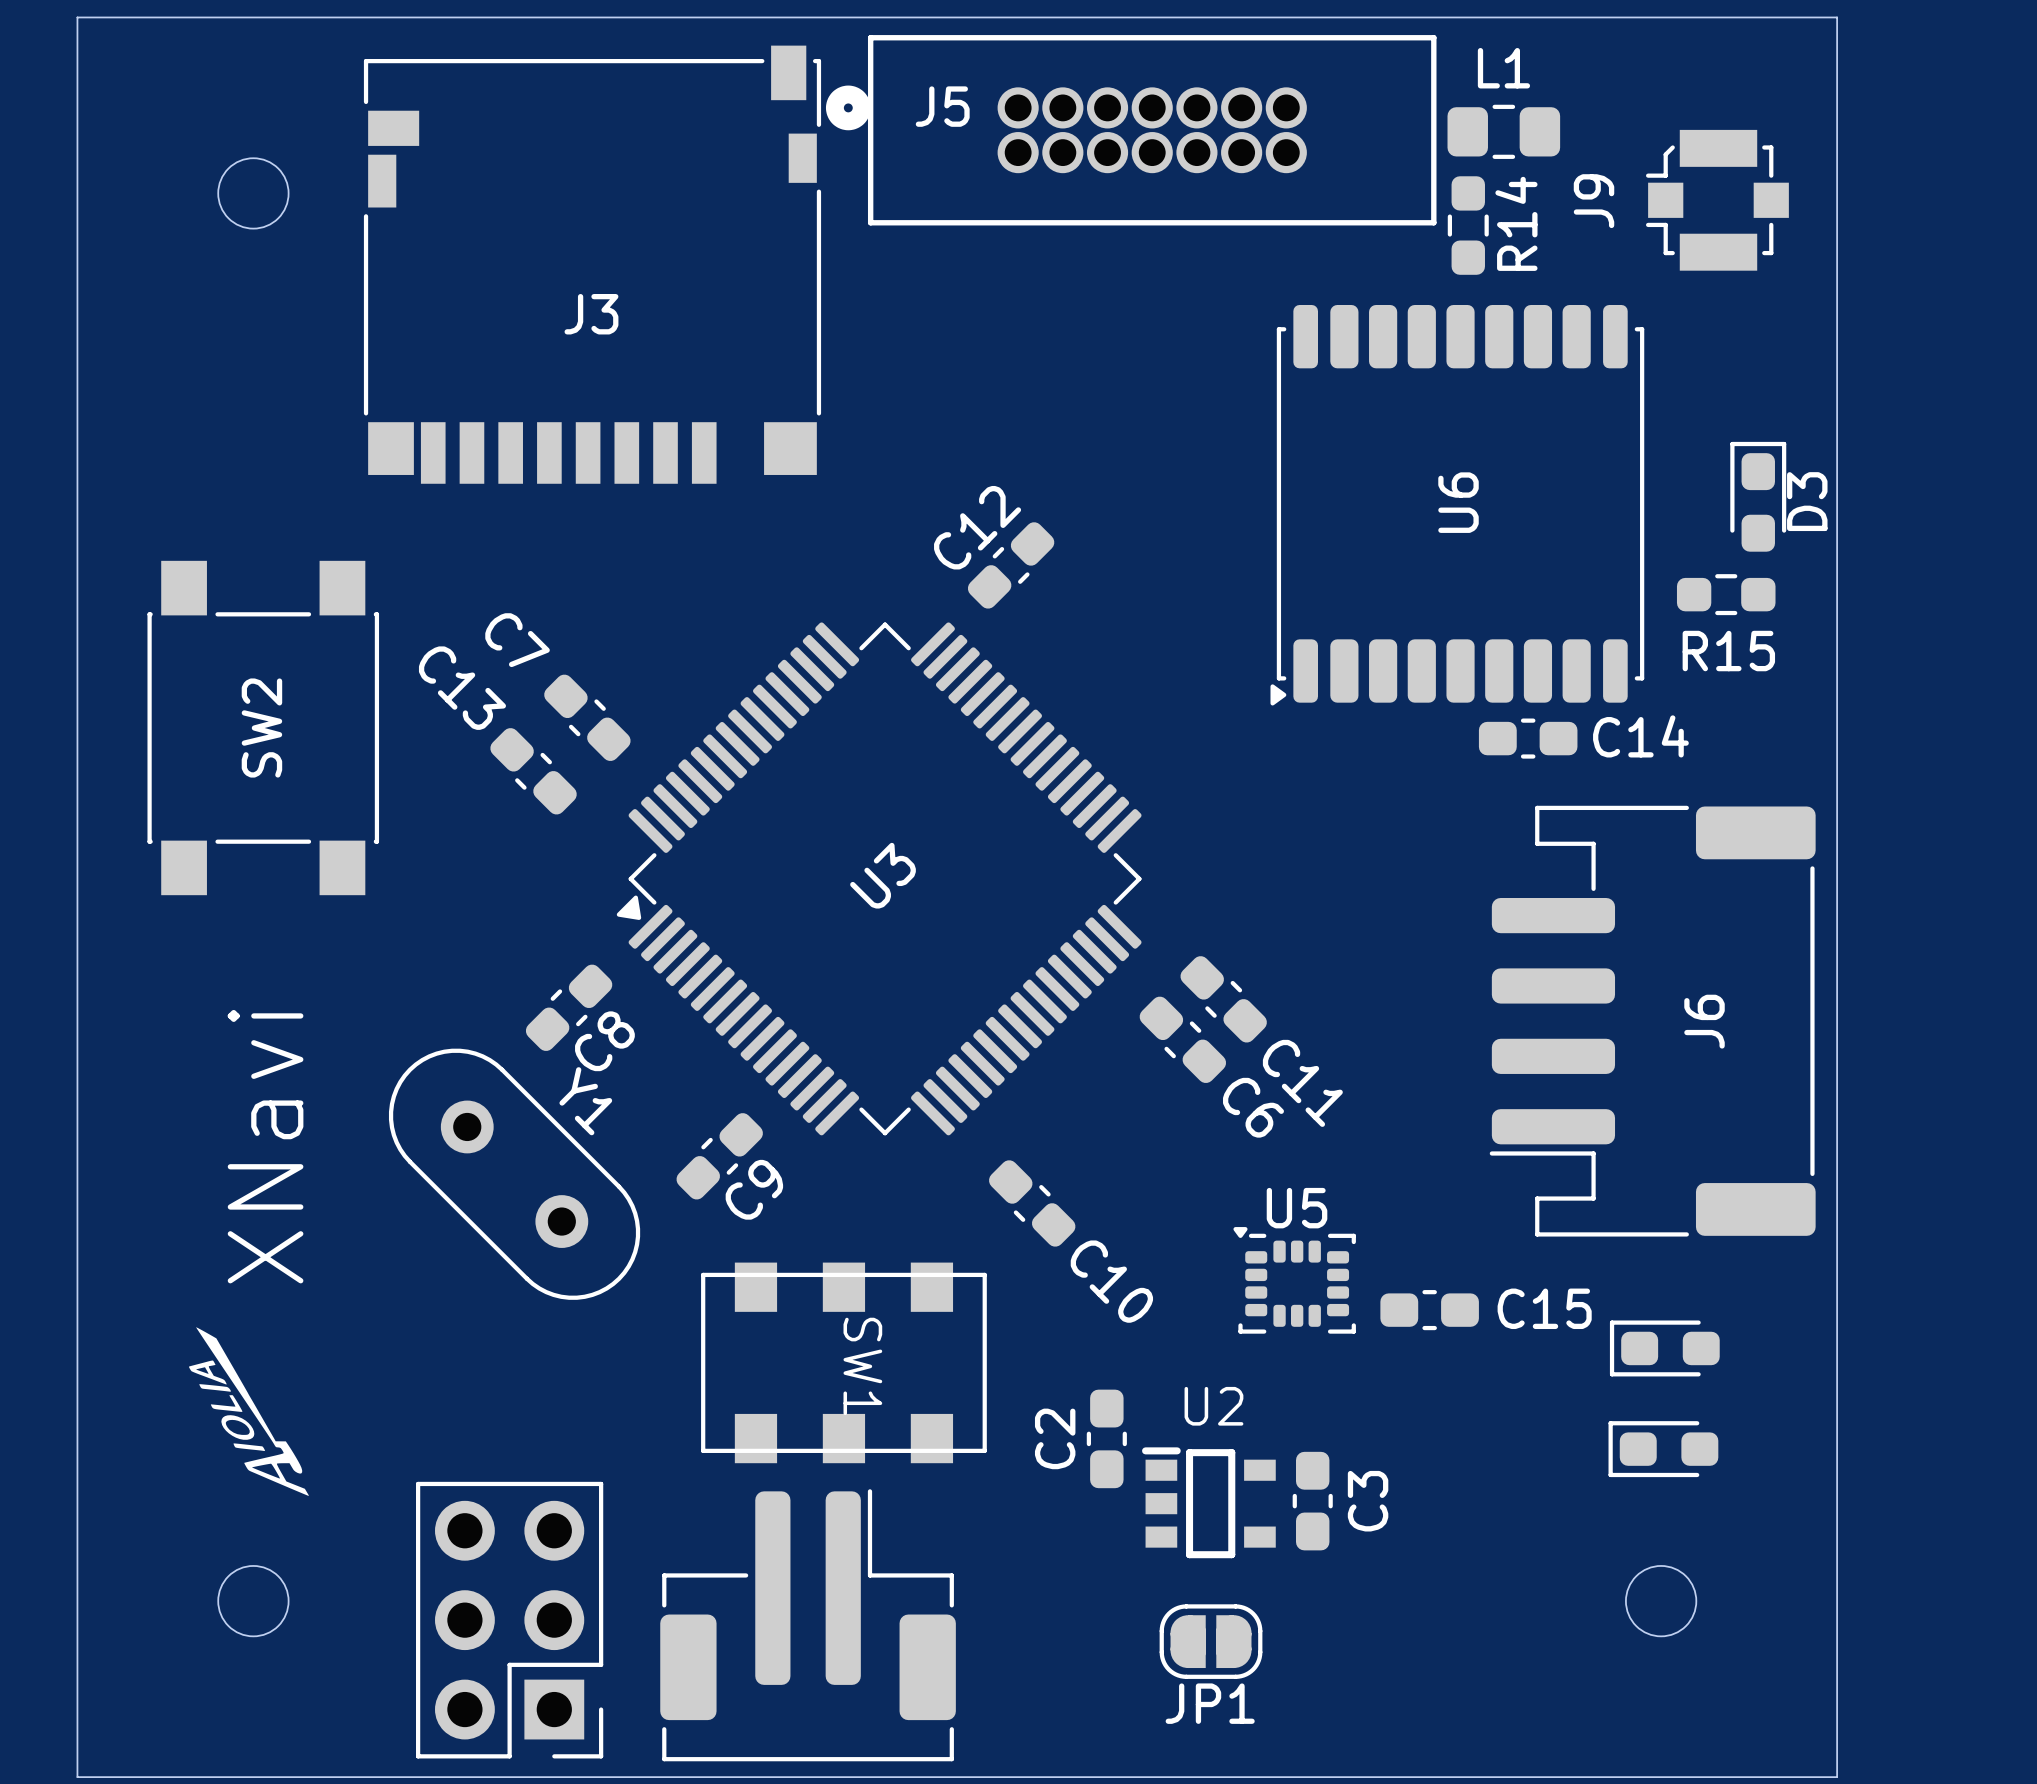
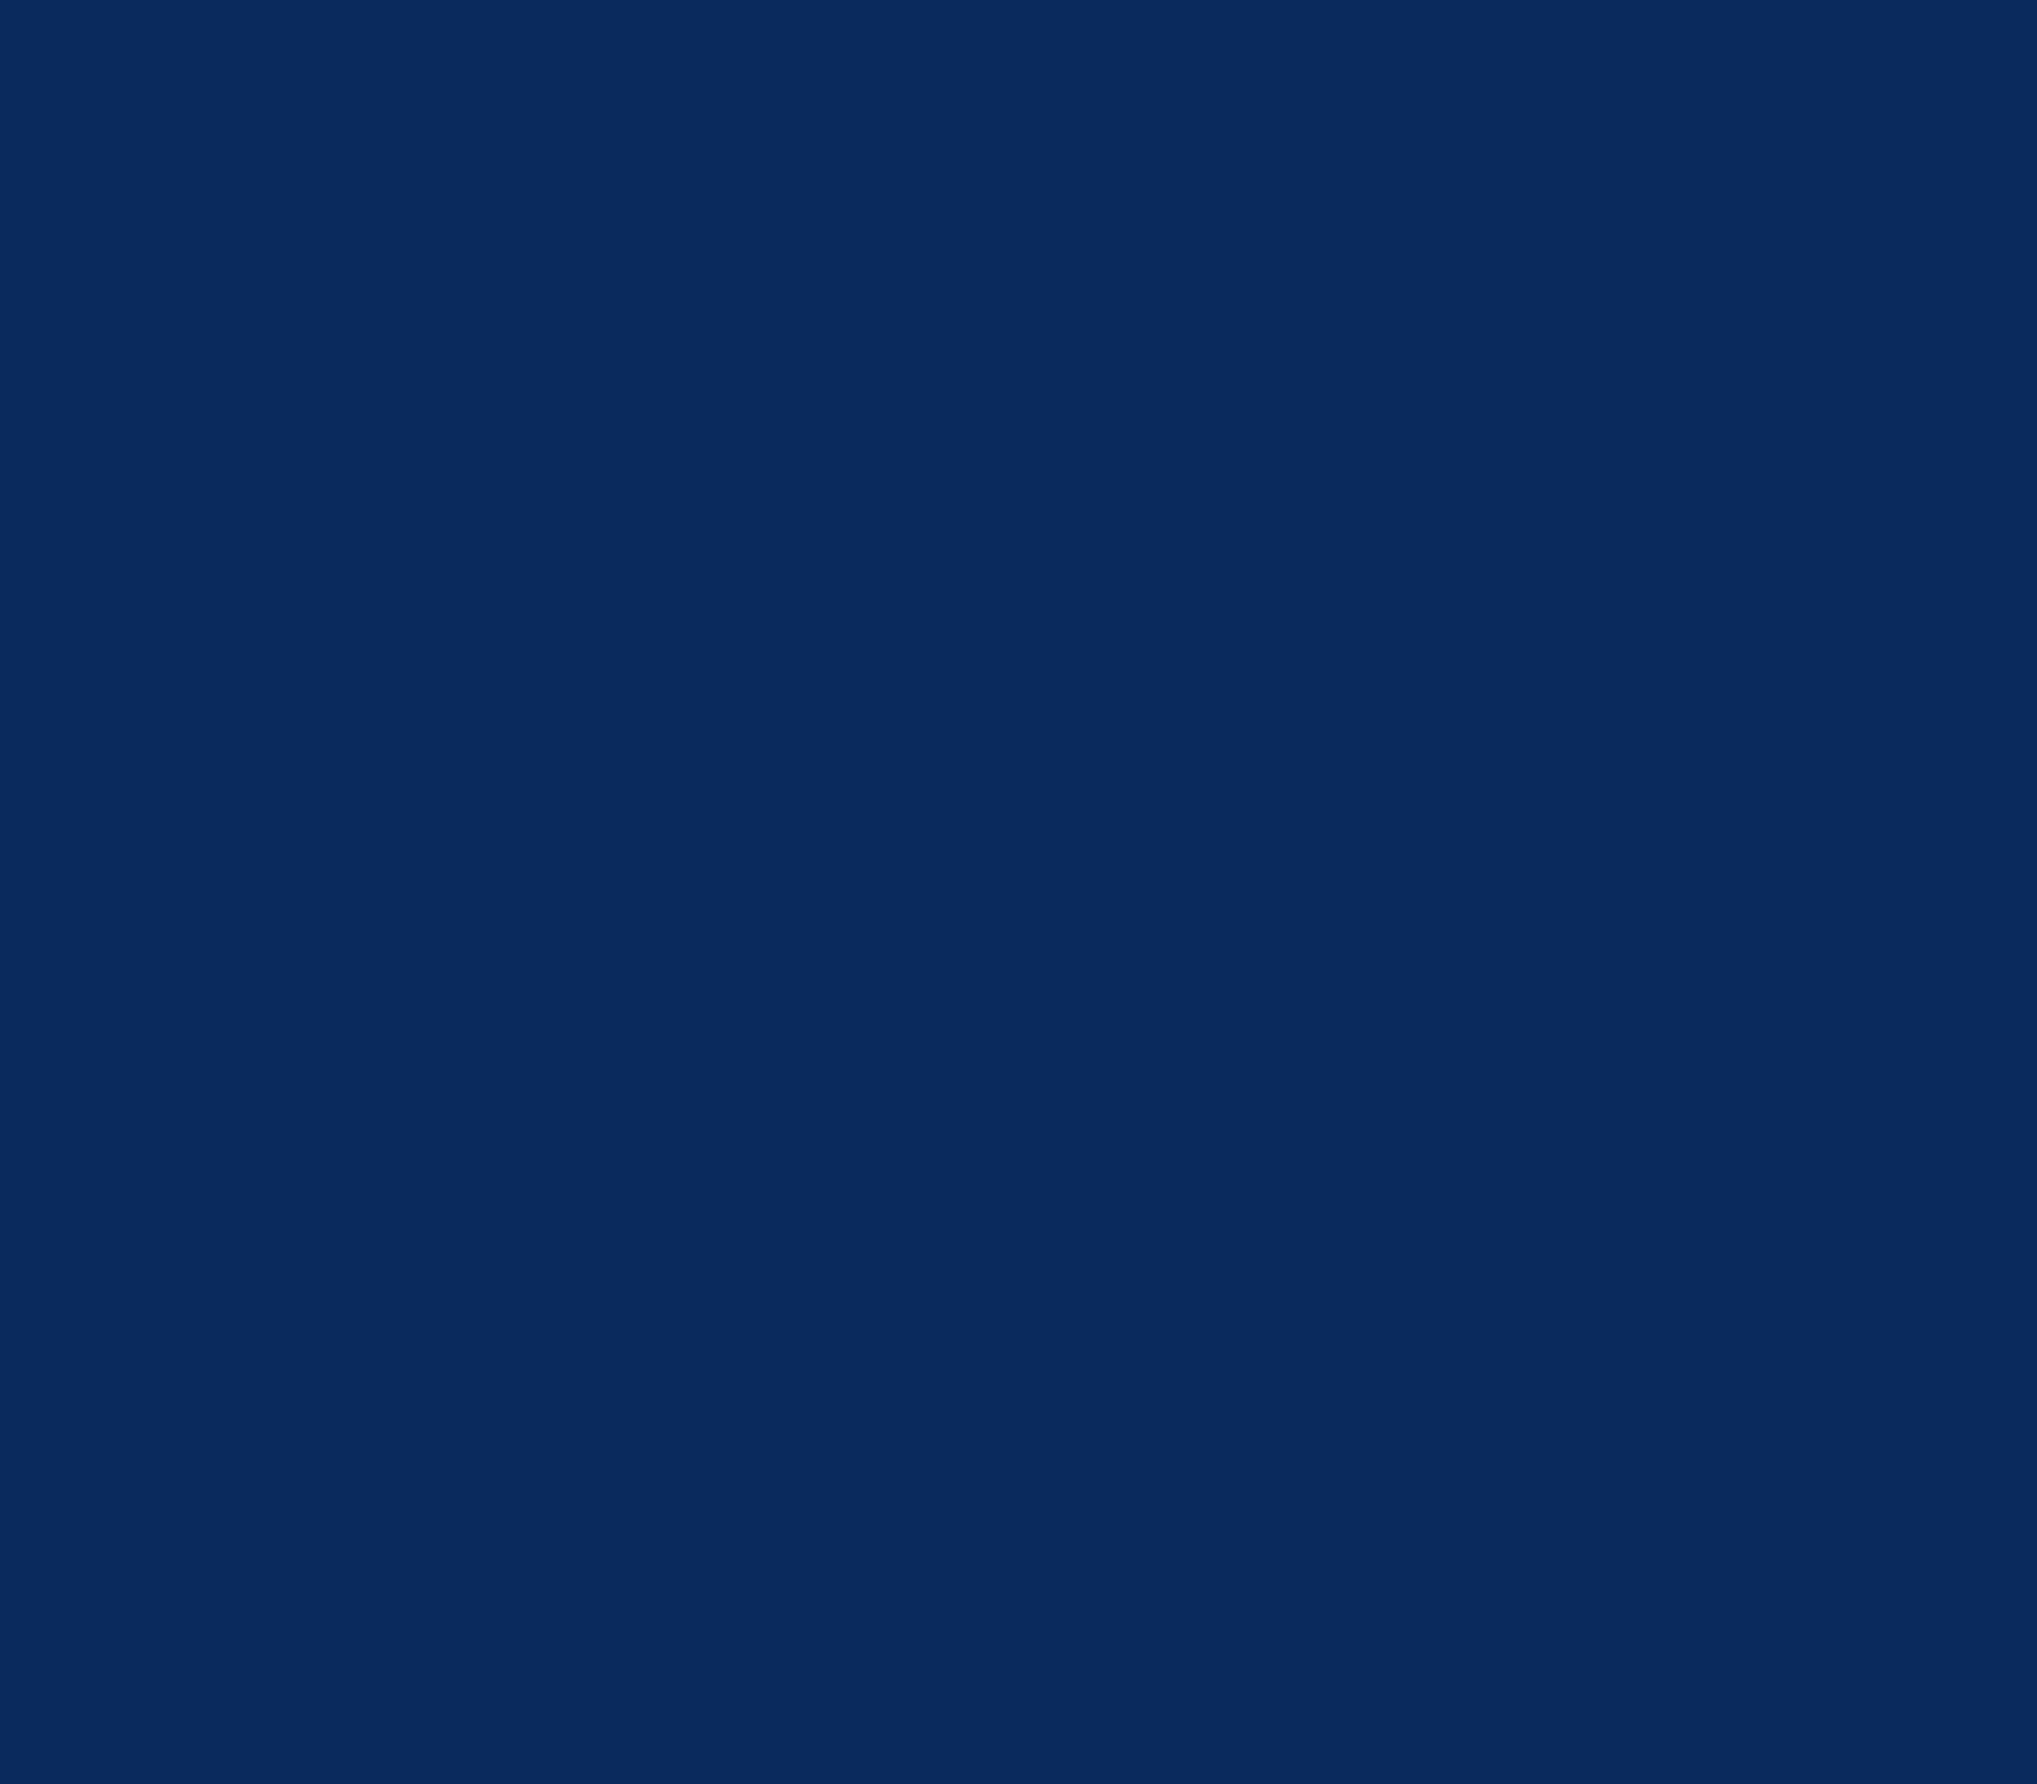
board edge: (77, 17) (1837, 17) (1837, 1777) (77, 1777) (77, 17) -> none
J5: (1131, 130) -> none
L1: (1503, 131) -> none
round board edge: [217, 157, 290, 230] -> none
J9: (1717, 200) -> none
R14: (1468, 225) -> none
J3: (592, 264) -> none
D3: (1758, 496) -> none
U6: (1457, 505) -> none
C12: (1011, 565) -> none
R15: (1726, 594) -> none
C7: (587, 717) -> none
SW2: (263, 728) -> none
C14: (1528, 738) -> none
C13: (533, 771) -> none
U3: (879, 878) -> none
C11: (1223, 999) -> none
C8: (569, 1007) -> none
J6: (1652, 1021) -> none
C6: (1182, 1039) -> none
text: XNavi (265, 1146) -> none
C9: (719, 1156) -> none
Y1: (514, 1174) -> none
C10: (1032, 1203) -> none
U5: (1294, 1280) -> none
C15: (1429, 1310) -> none
drawing: [189, 1327, 309, 1496] -> none
part: (1664, 1348) -> none
SW1: (843, 1362) -> none
C2: (1106, 1438) -> none
part: (1663, 1449) -> none
C3: (1312, 1501) -> none
U2: (1208, 1502) -> none
round board edge: [217, 1565, 290, 1638] -> none
round board edge: [1625, 1565, 1698, 1638] -> none
part: (509, 1620) -> none
part: (808, 1625) -> none
JP1: (1211, 1641) -> none

